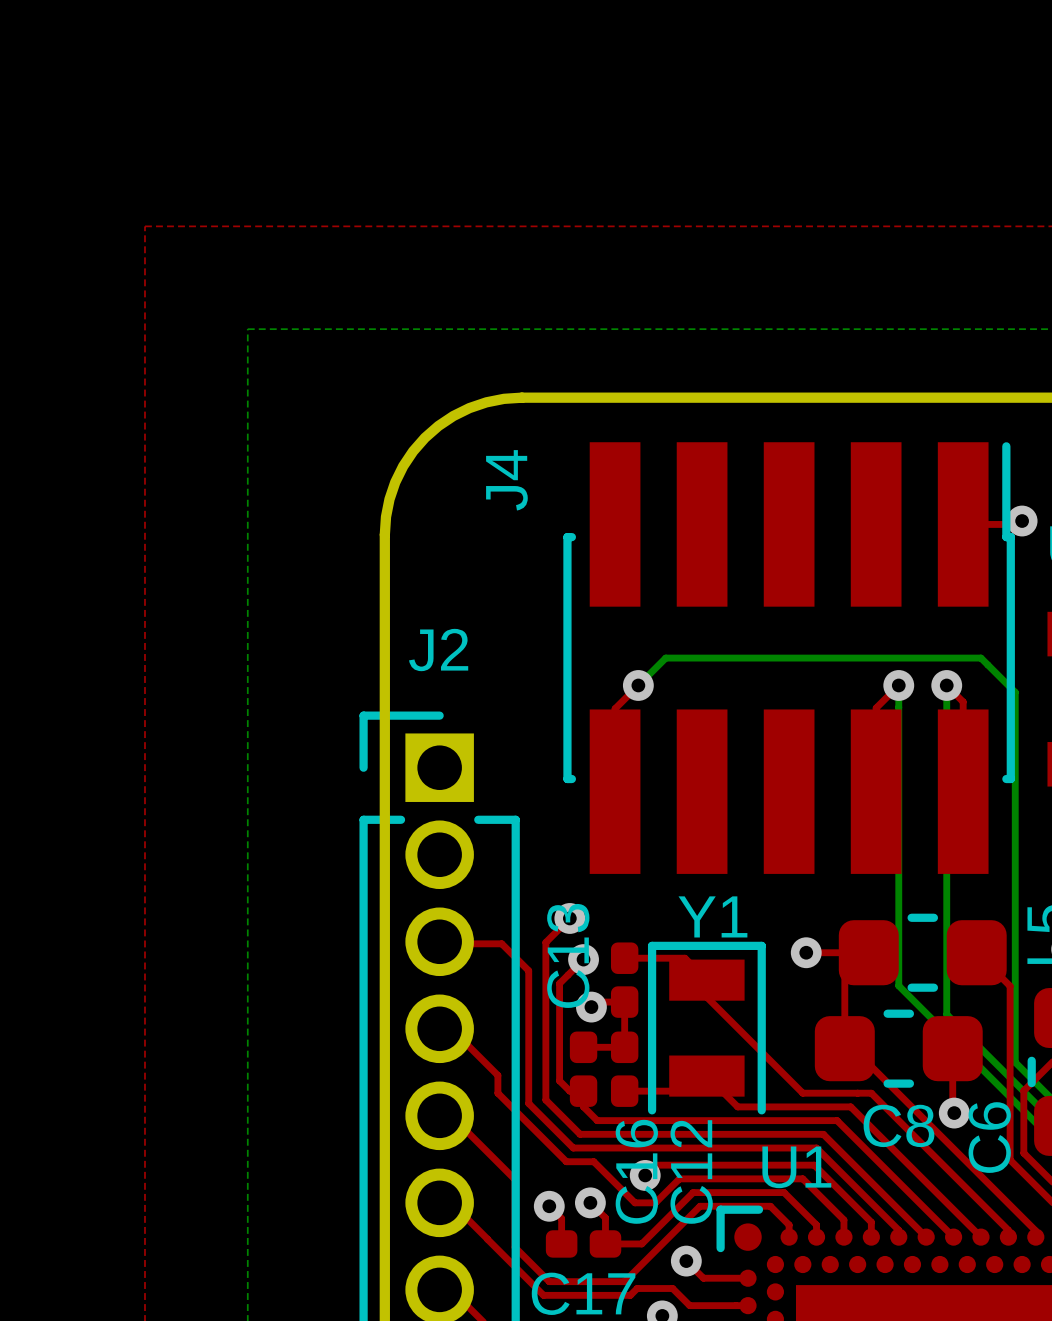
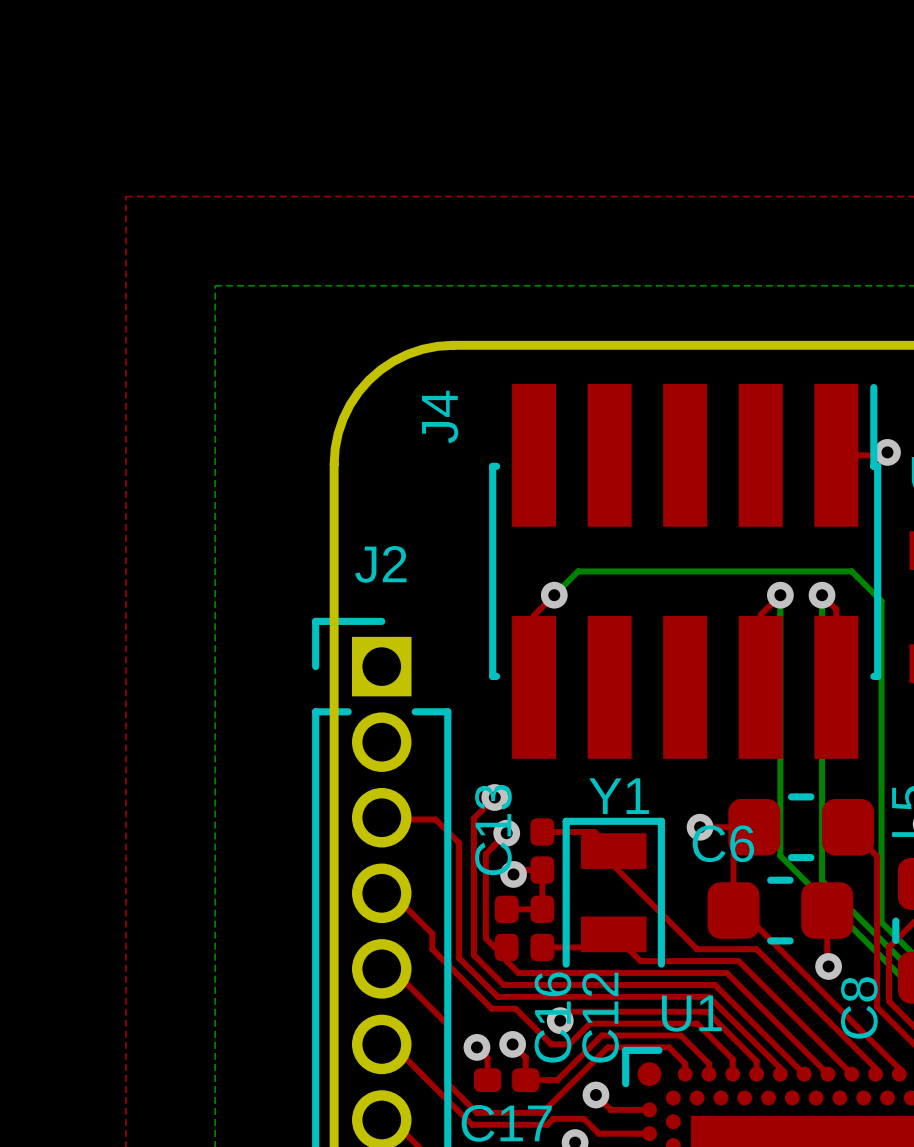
C8 name: C8 (898, 1125) -> C6 (723, 843)
C6 name: C6 (989, 1137) -> C8 (859, 1007)

